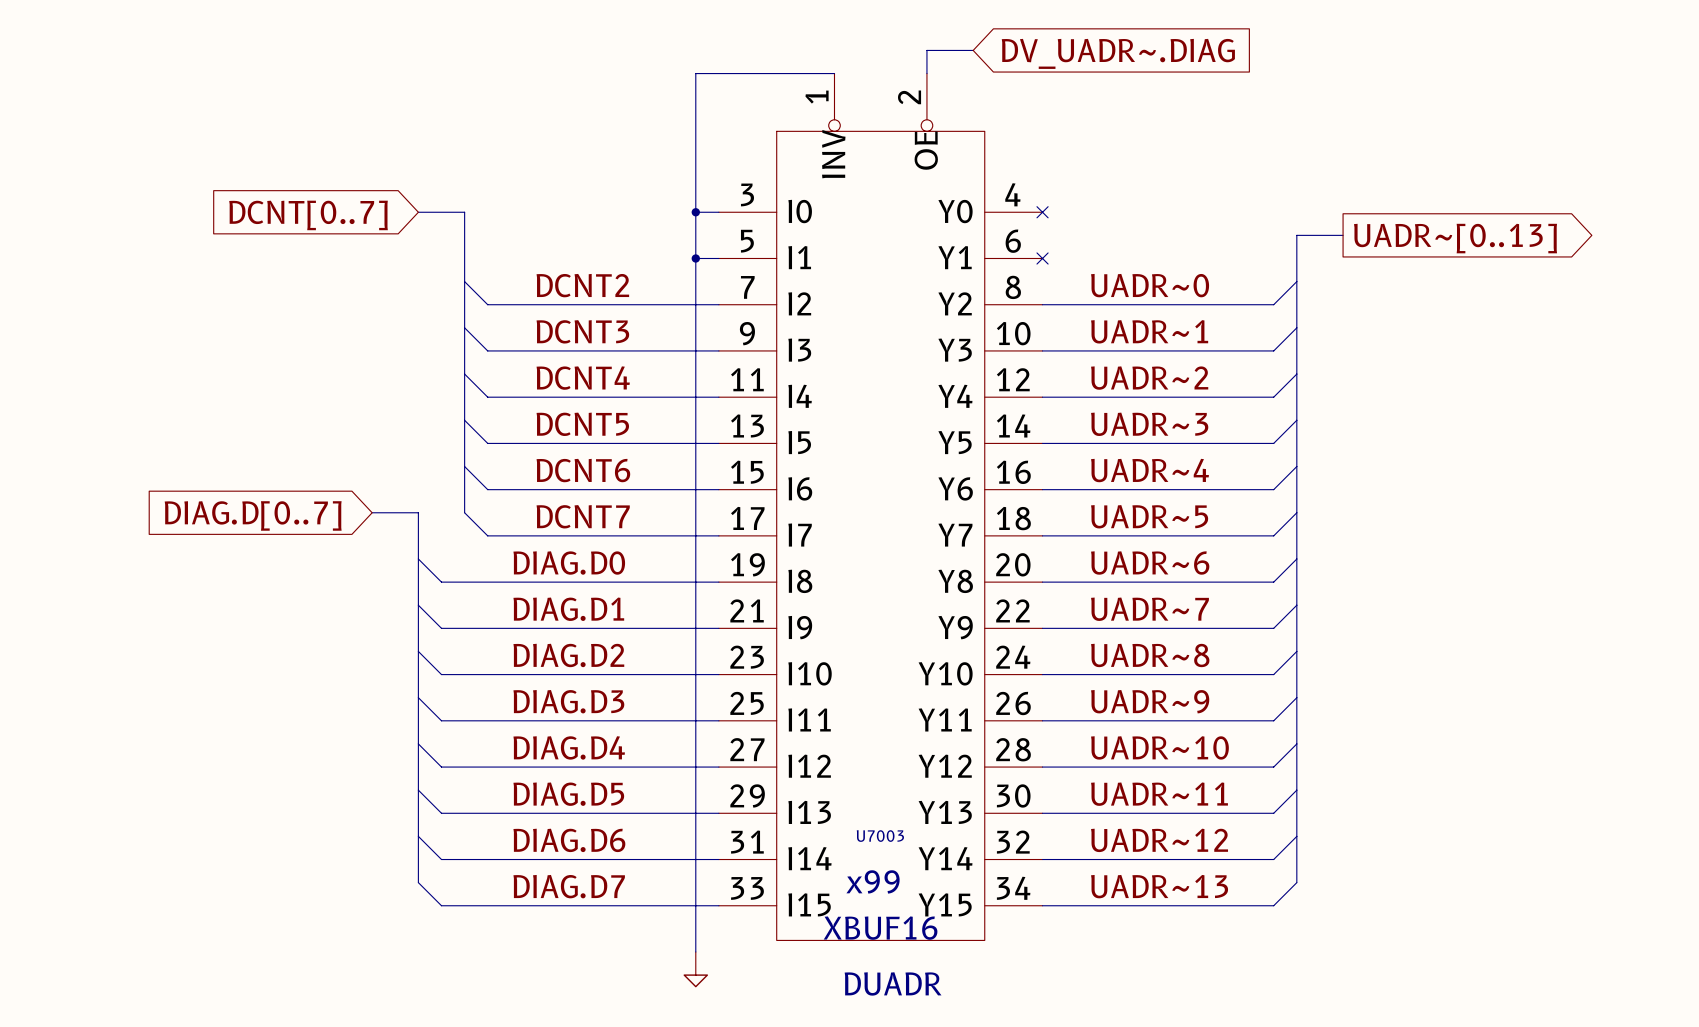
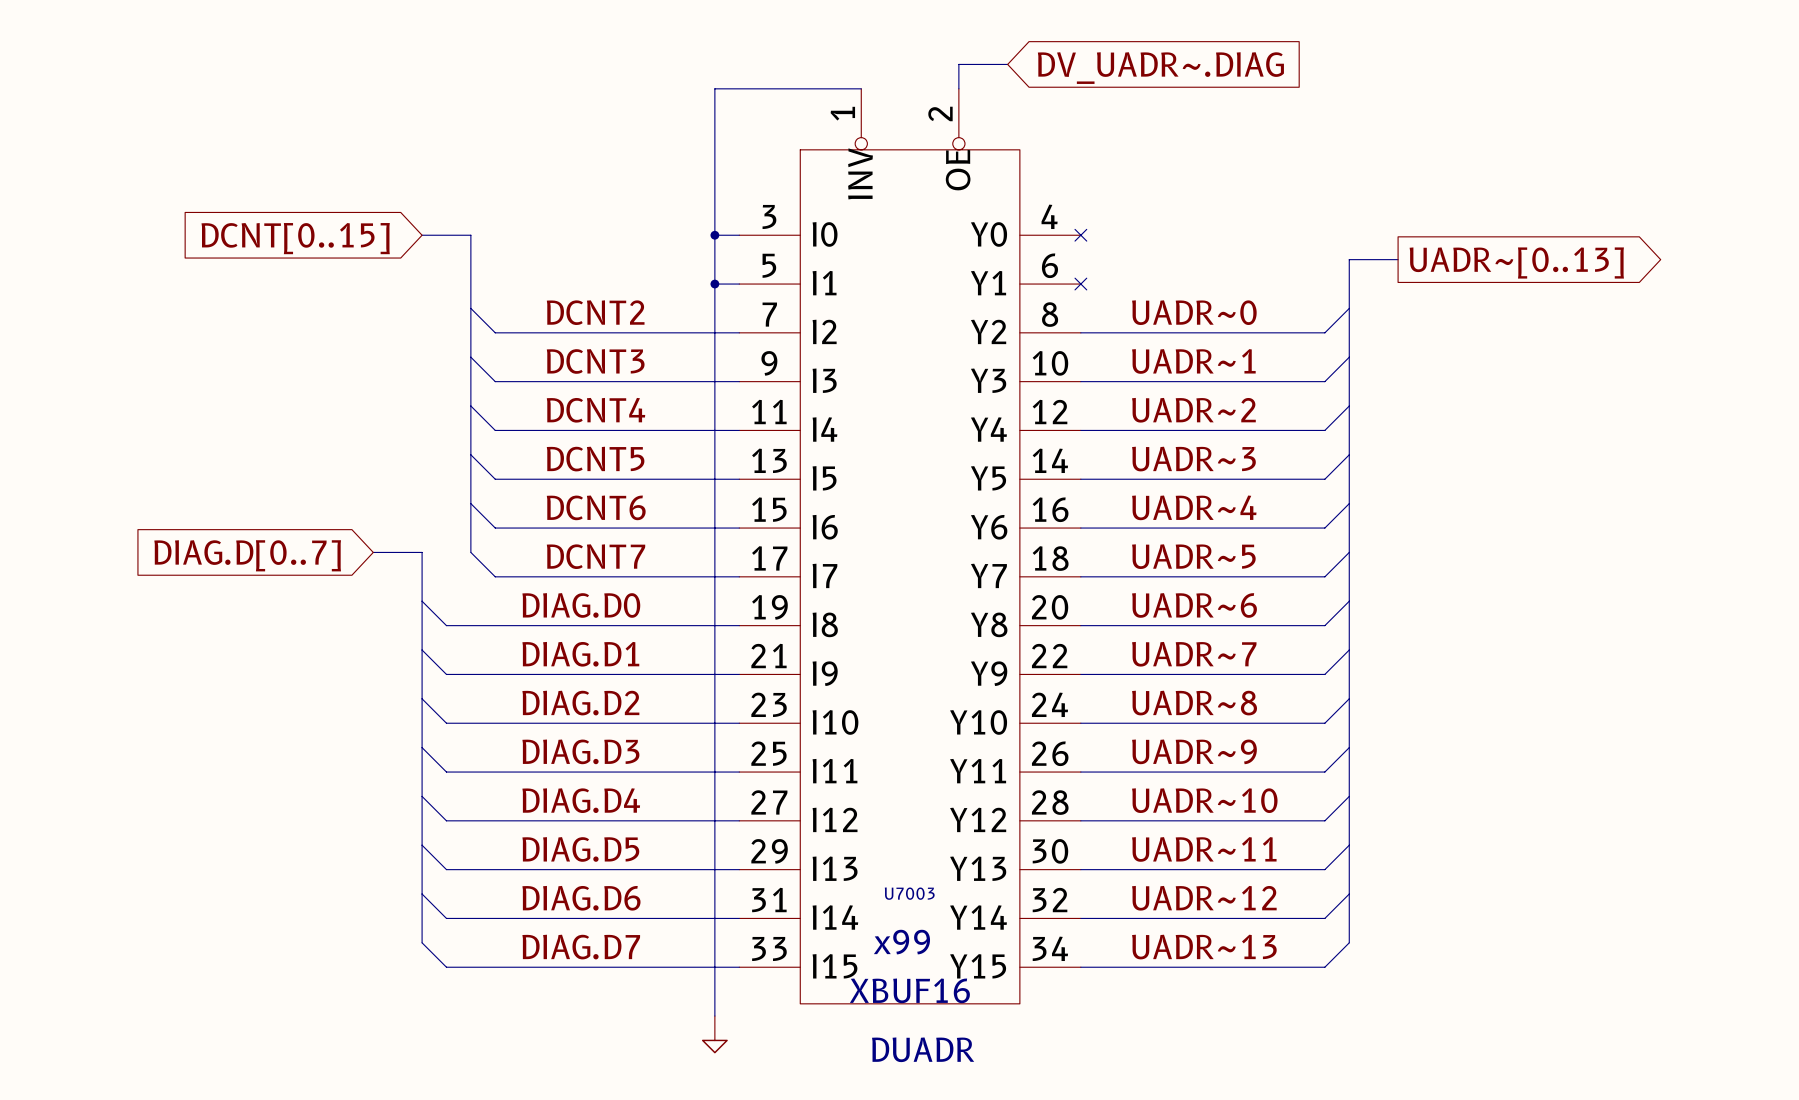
global label: DCNT[0..7] (308, 215) -> DCNT[0..15] (295, 238)

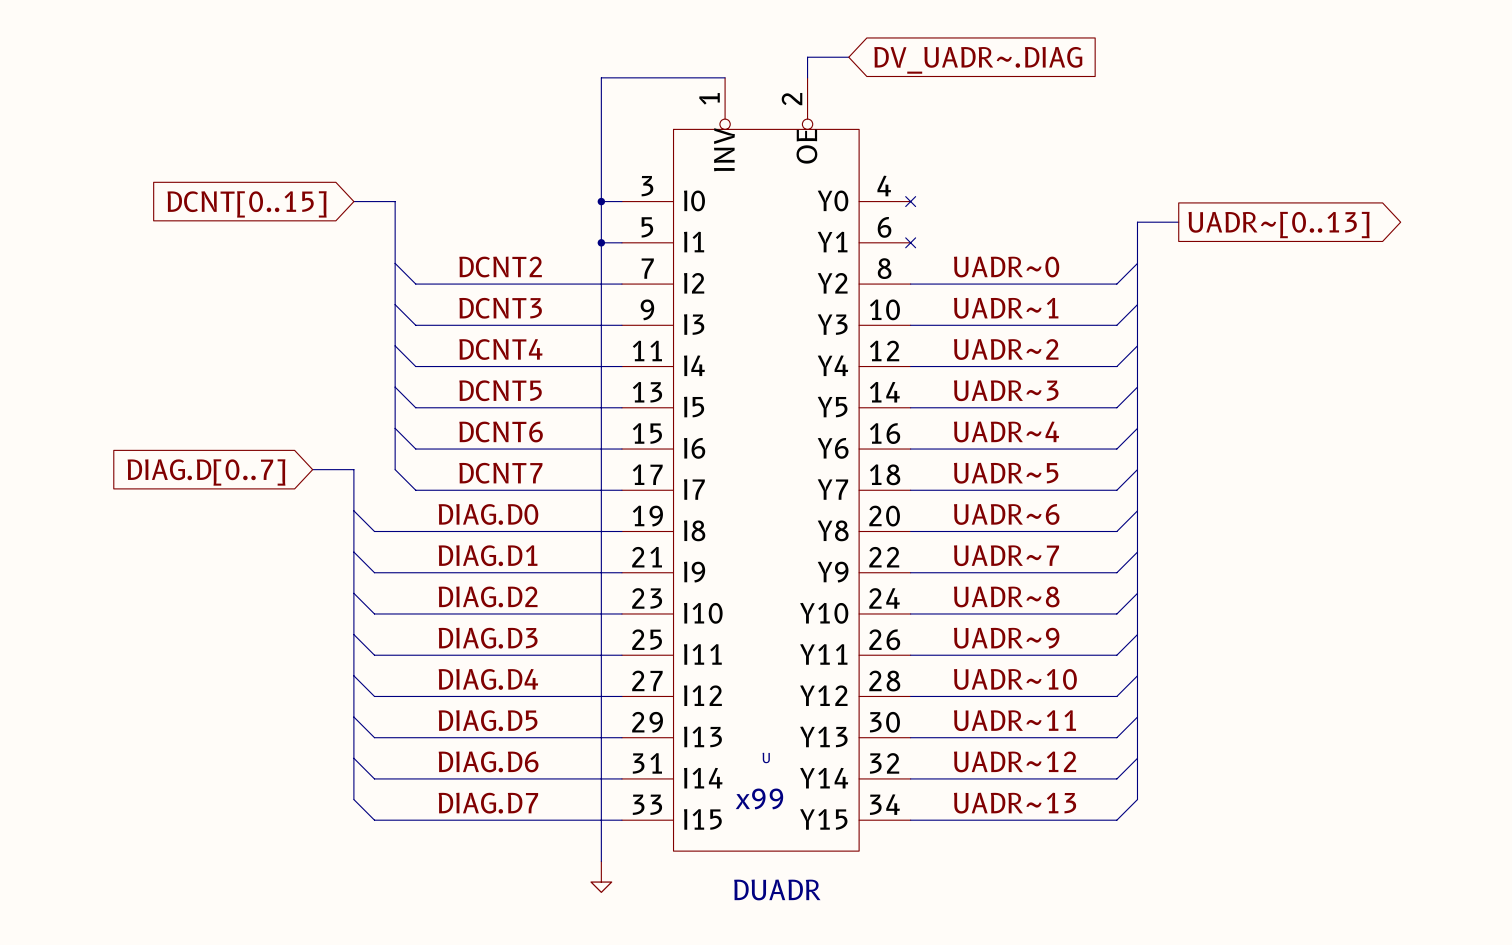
U7003 name: U7003 (909, 893) -> U (766, 758)
U7003 value: XBUF16 (909, 990) -> none

